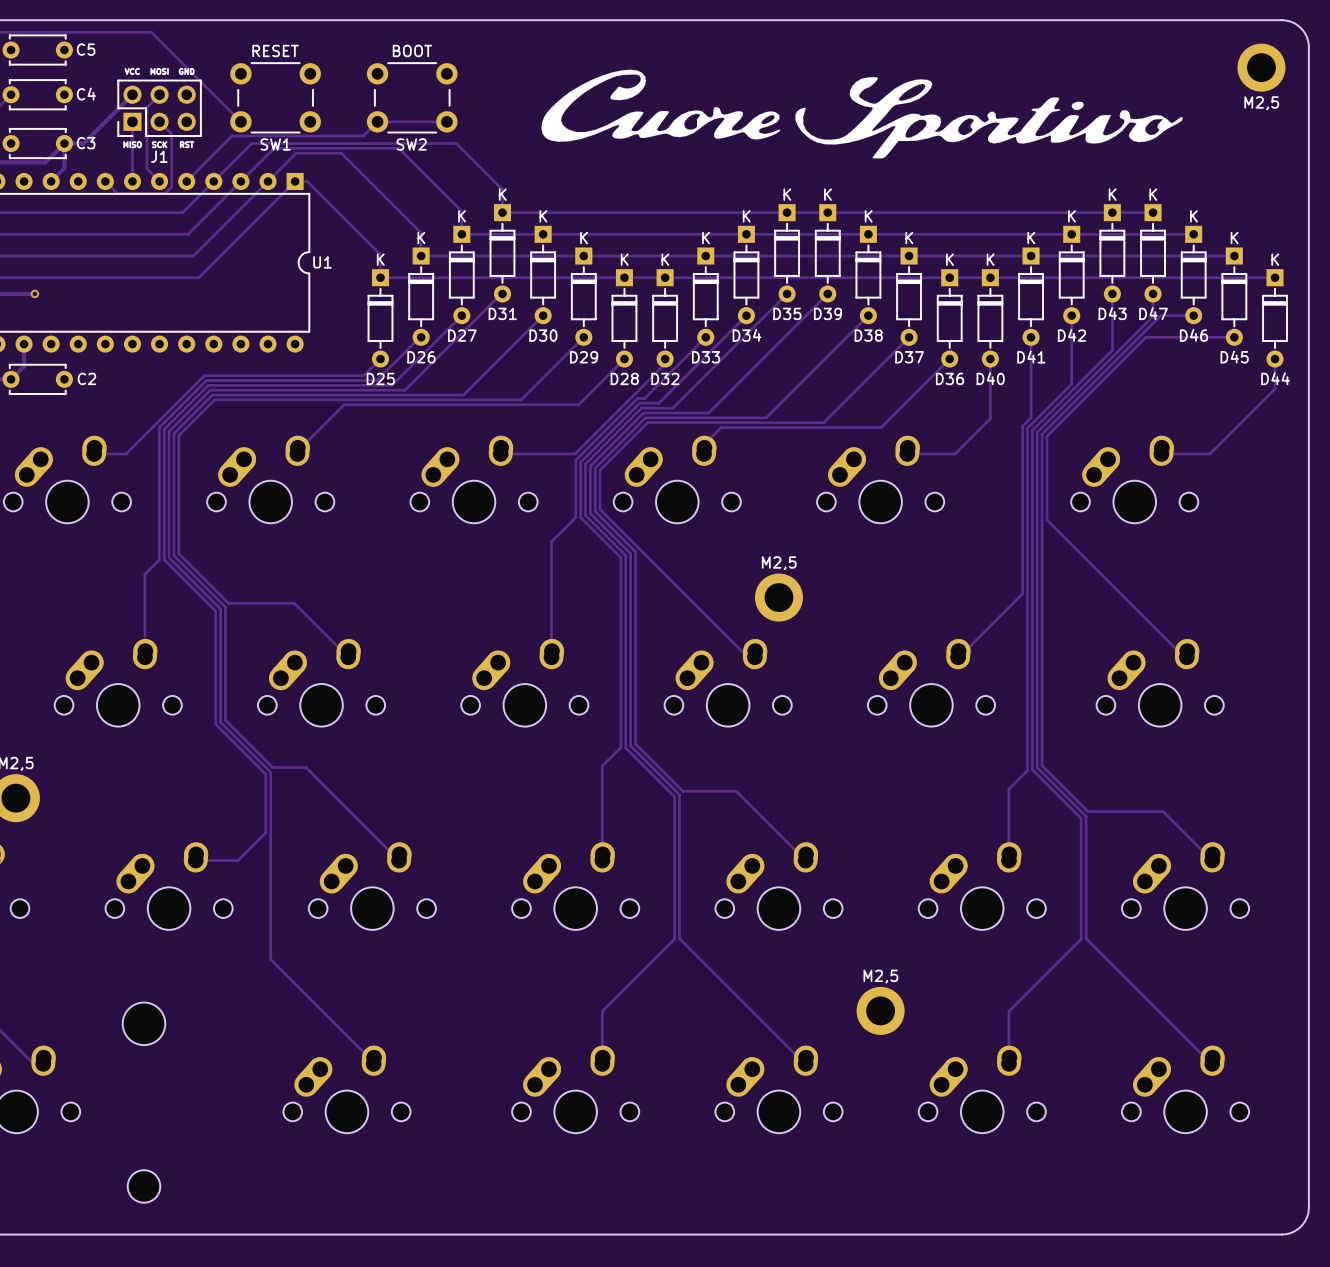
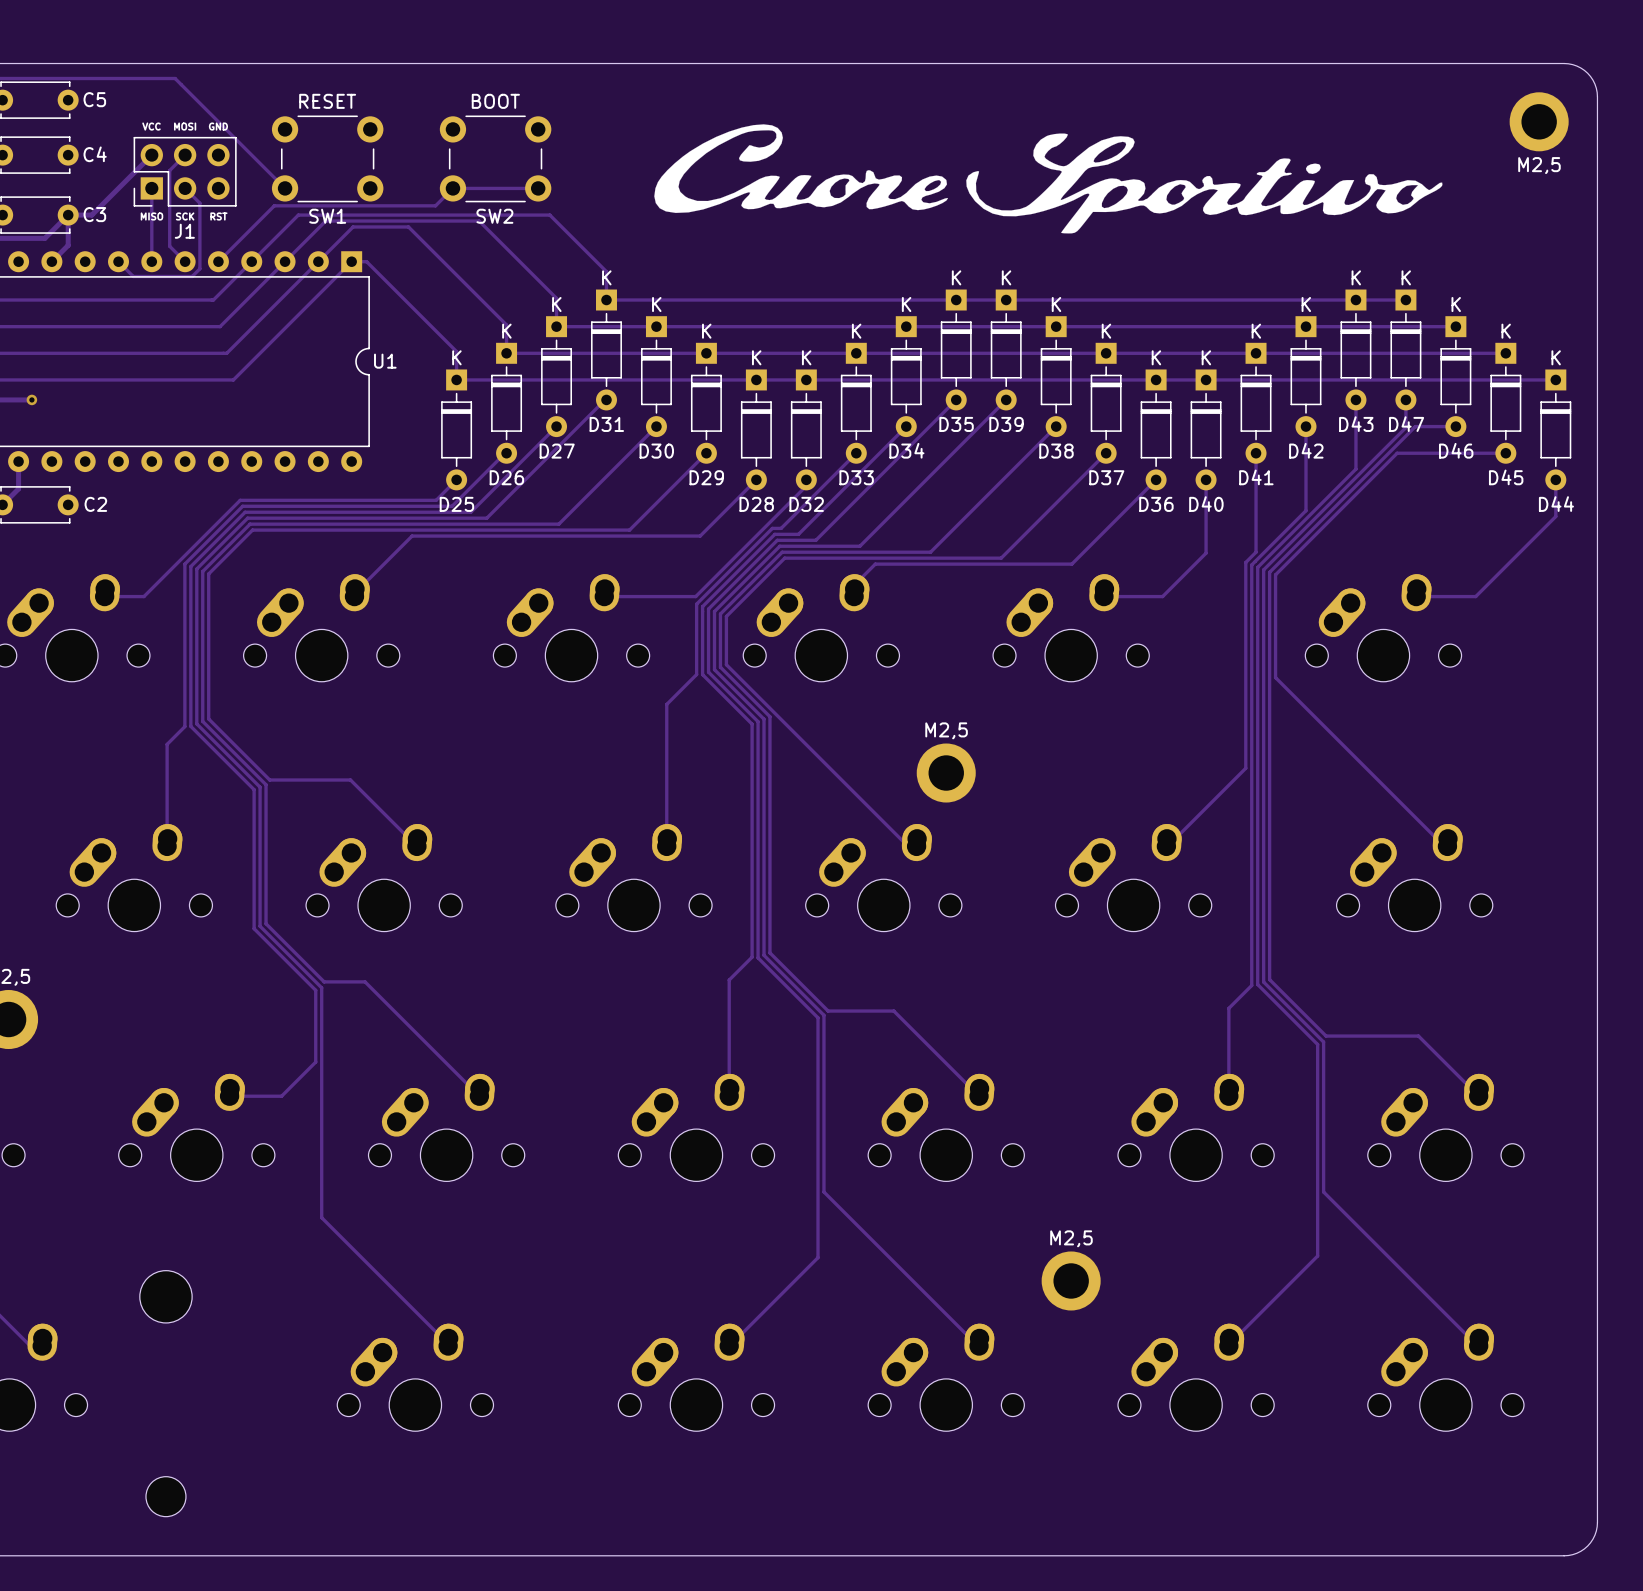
track: (674, 939) (602, 1011) (602, 1063) -> (818, 1192) (818, 1257) (729, 1346)
track: (1081, 939) (1008, 1011) (1008, 1062) -> (1317, 1192) (1317, 1256) (1228, 1344)

